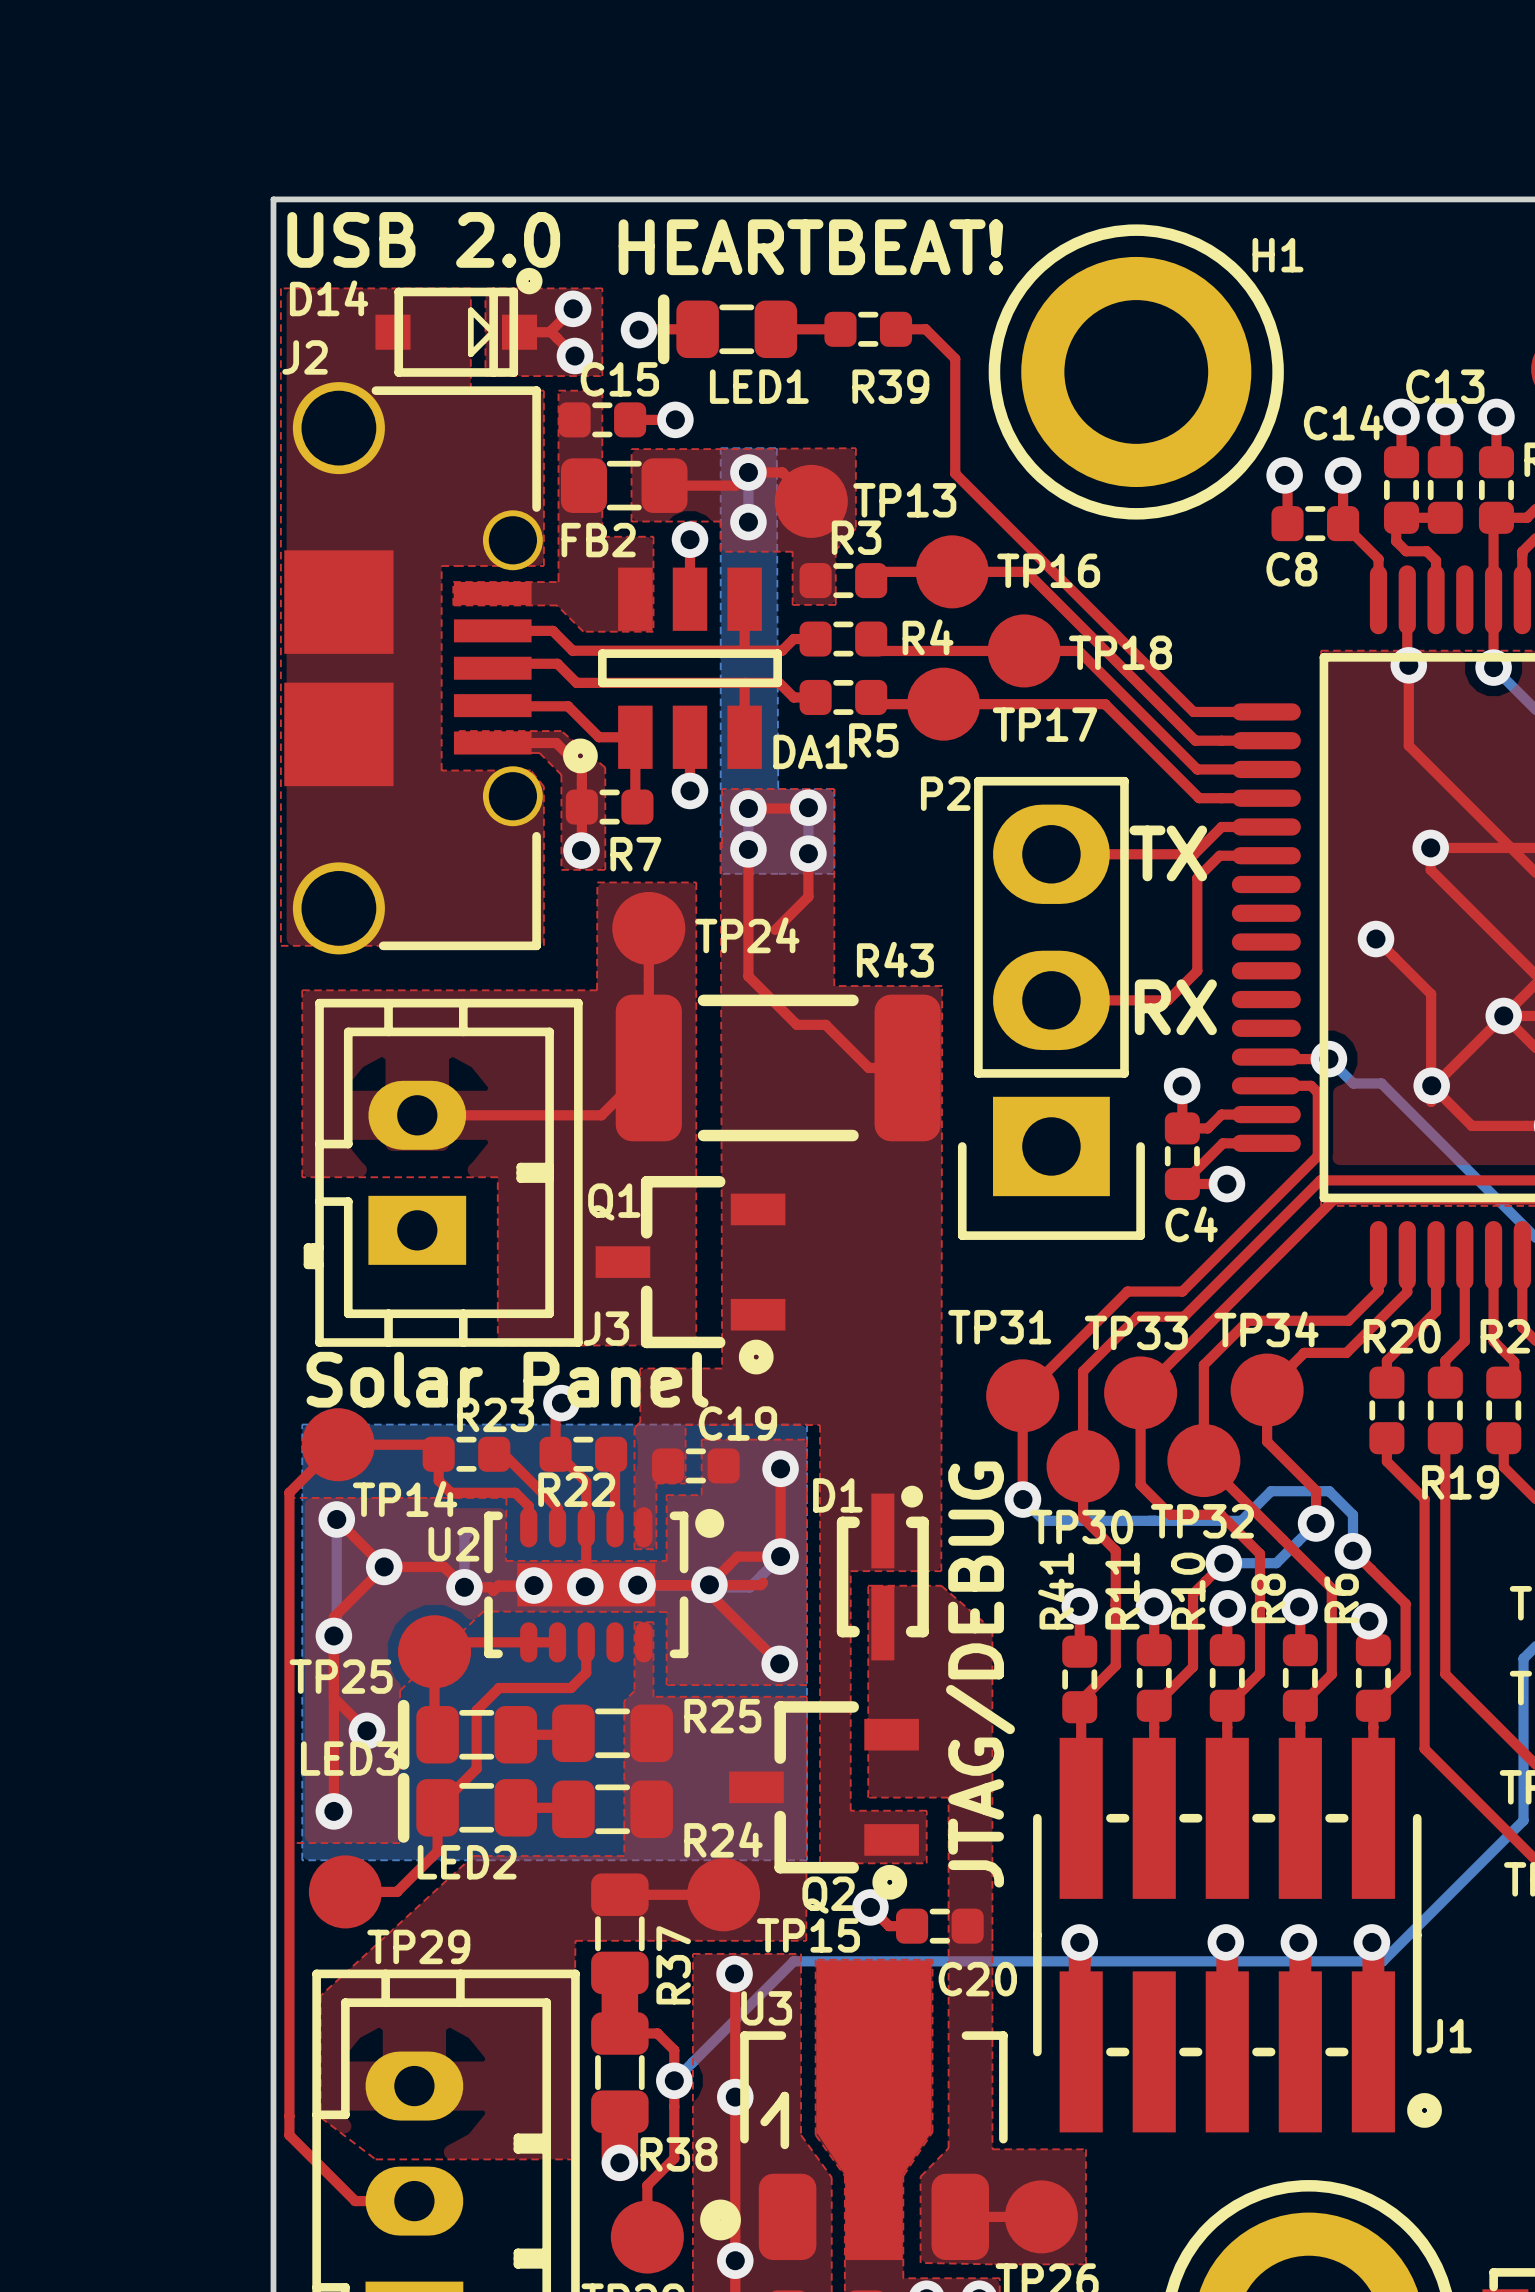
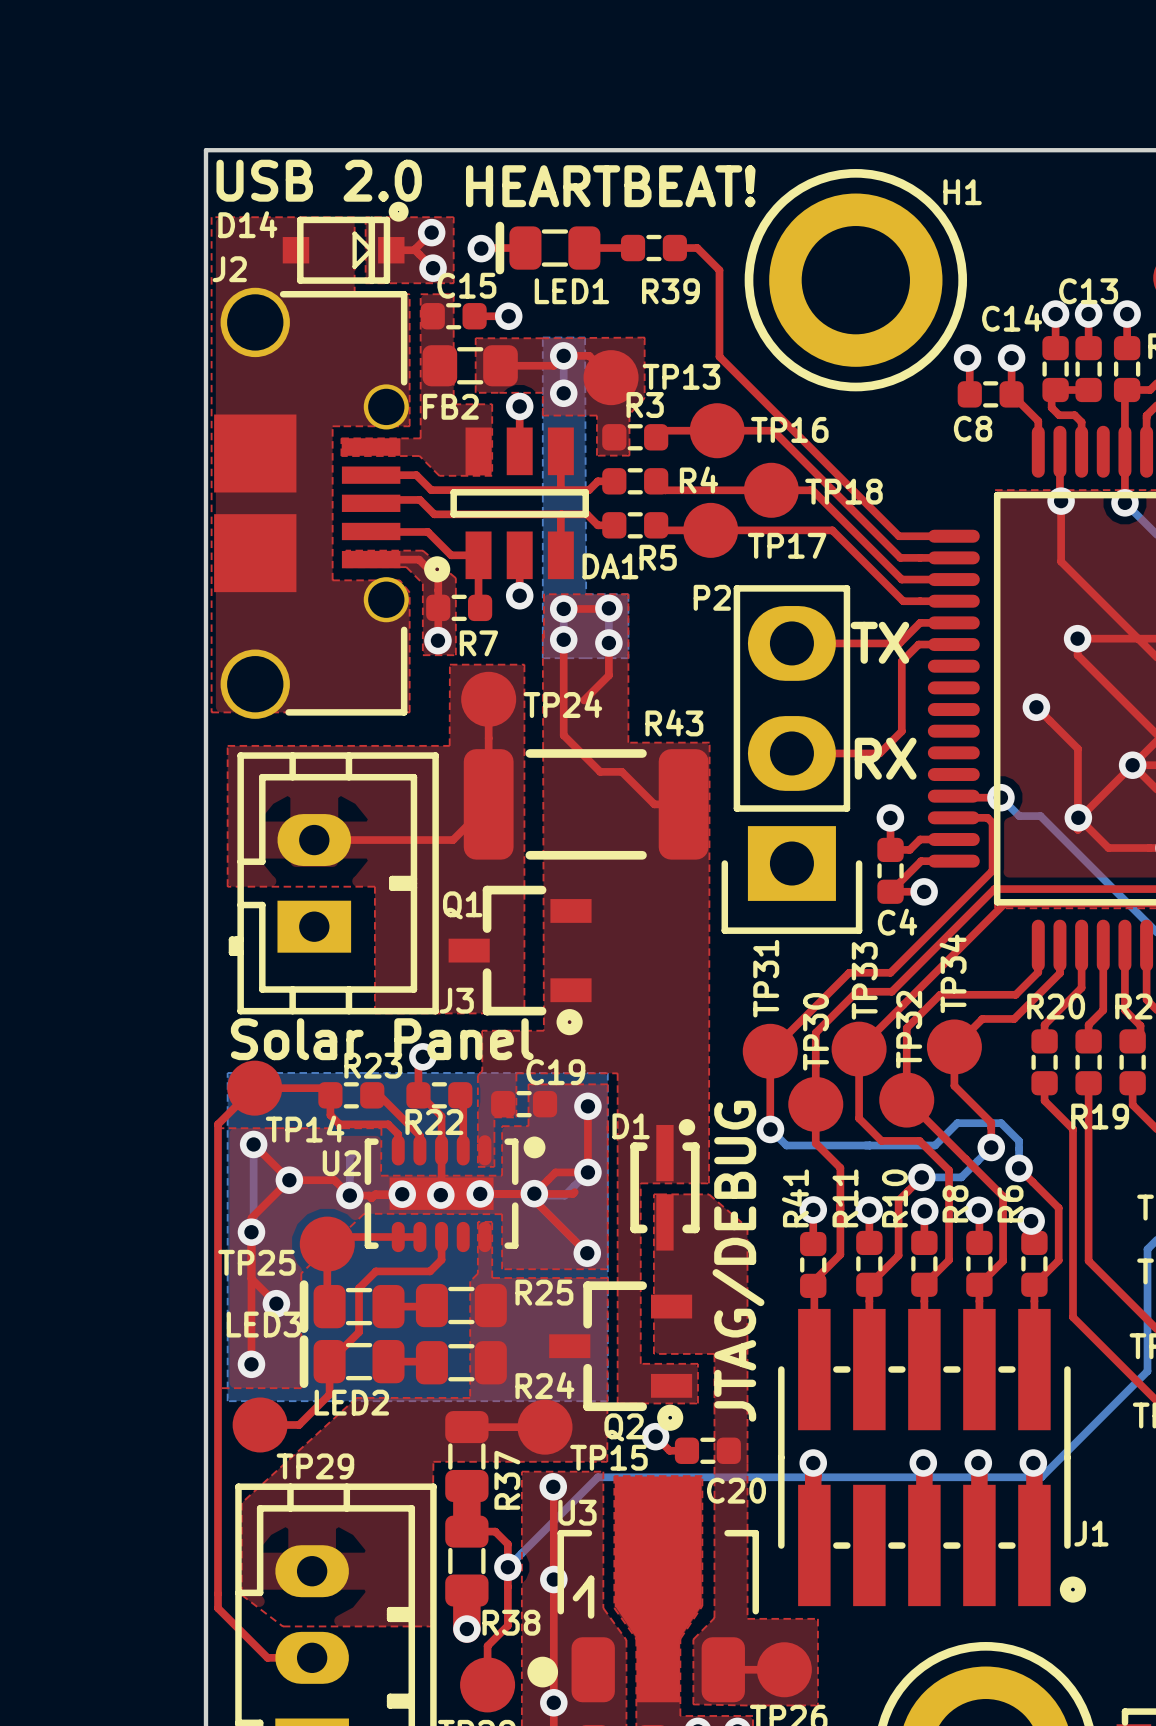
TP31 name rotation: 0° (999, 1327) -> 90° counterclockwise (766, 978)
TP34 name rotation: 0° (1266, 1329) -> 90° counterclockwise (953, 973)
TP33 name rotation: 0° (1136, 1332) -> 90° counterclockwise (864, 980)
TP32 name rotation: 0° (1202, 1521) -> 90° counterclockwise (909, 1029)
TP32 name position: TP32 (1202, 1521) -> TP32 (909, 1029)
TP30 name rotation: 0° (1081, 1527) -> 90° counterclockwise (816, 1031)
TP30 name position: TP30 (1081, 1527) -> TP30 (816, 1031)

